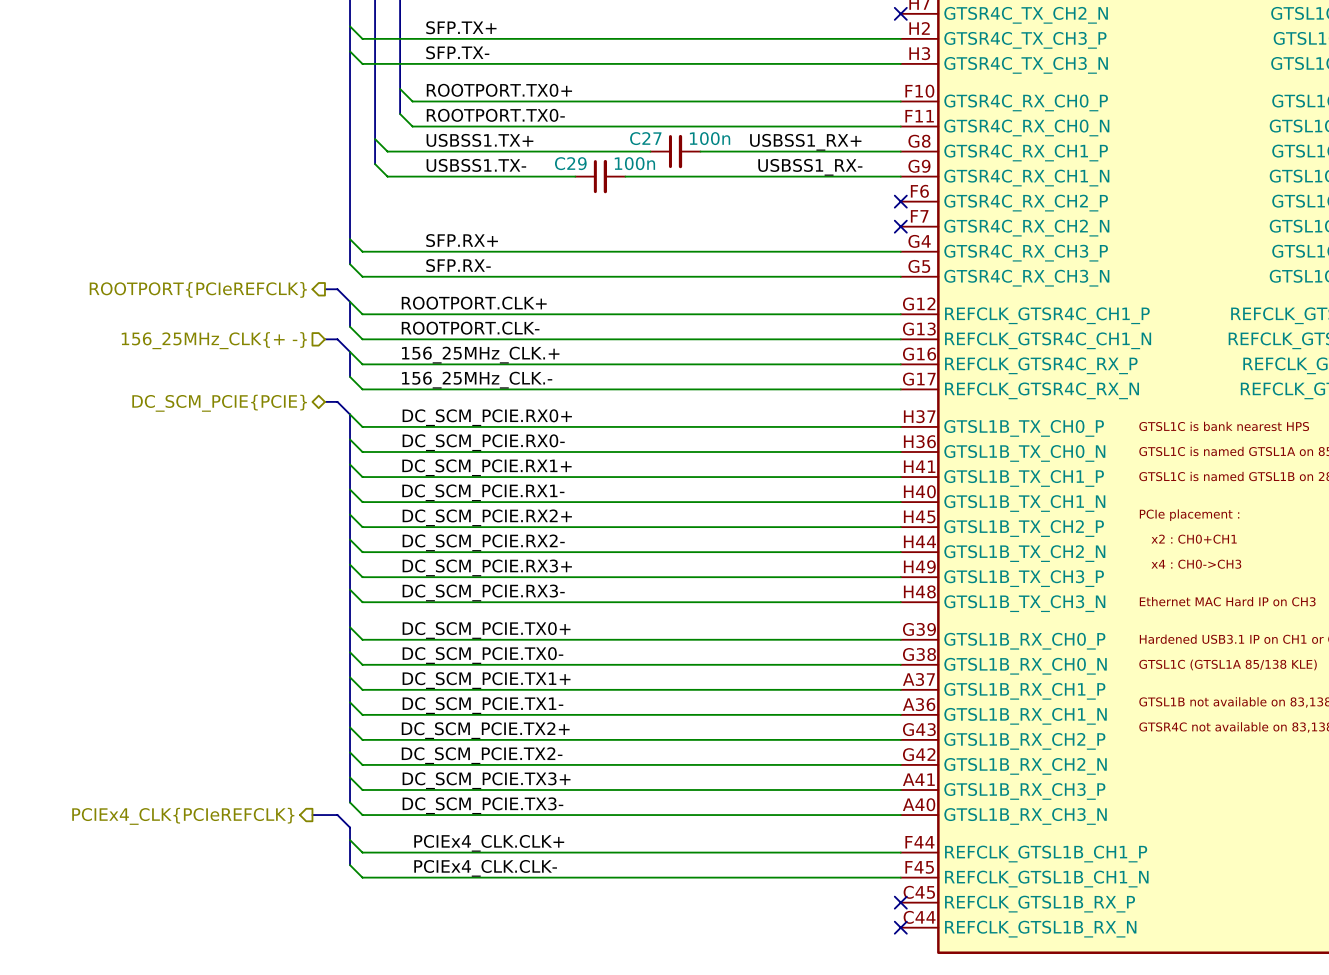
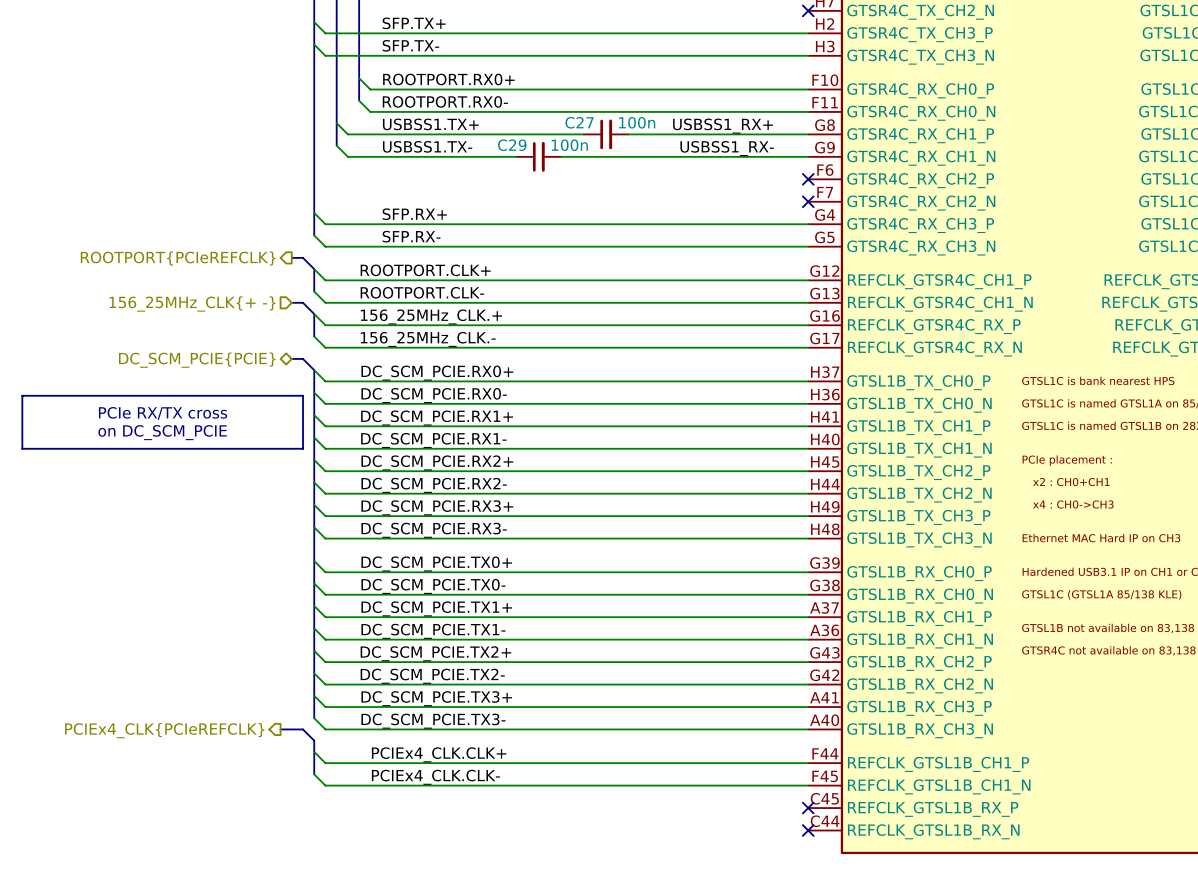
label: ROOTPORT.TX0+ (499, 90) -> ROOTPORT.RX0+ (448, 79)
label: ROOTPORT.TX0- (495, 115) -> ROOTPORT.RX0- (445, 101)
line: none -> (22, 395) (303, 395) (303, 448) (22, 448) (22, 395)
text: none -> PCIe RX/TX cross (163, 413)
text: none -> on DC_SCM_PCIE (162, 432)

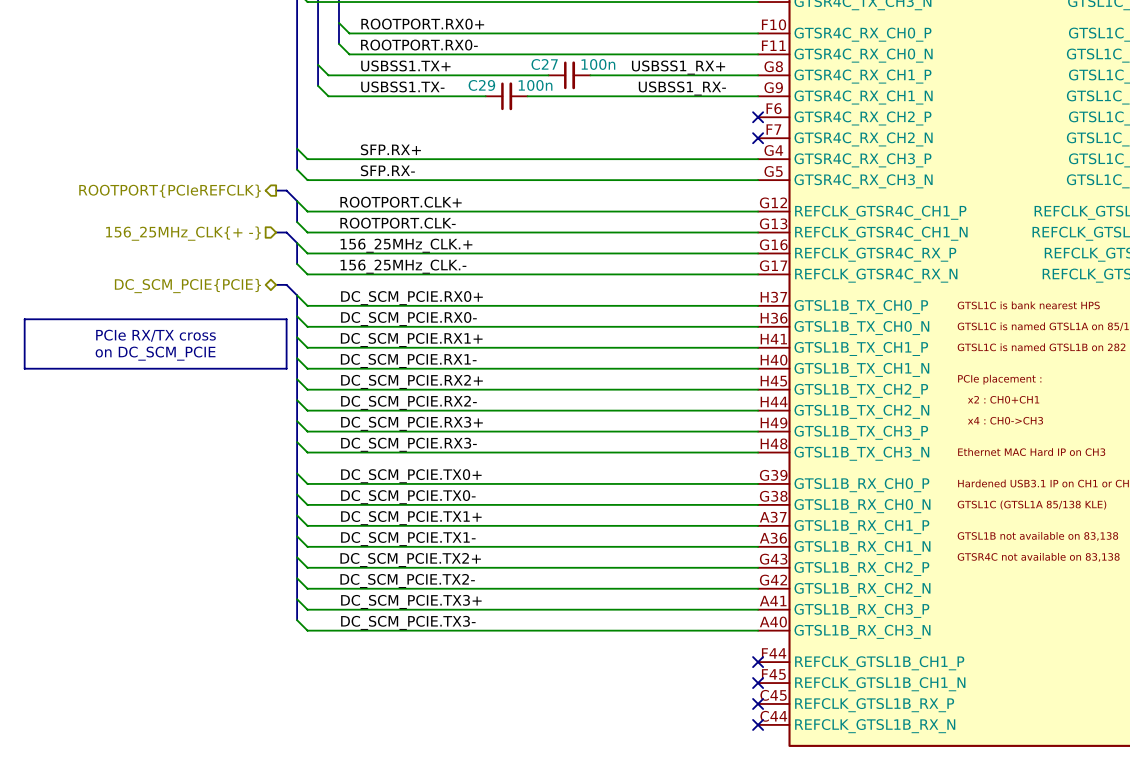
bus: (280, 729) (303, 729) (314, 740) (314, 774) -> none
hierarchical label: PCIEx4_CLK{PCIeREFCLK} (164, 730) -> none
wire: (314, 751) (325, 763) (808, 763) -> none
label: PCIEx4_CLK.CLK+ (439, 754) -> none
no-connect mark: none -> (758, 662)
wire: (314, 774) (325, 785) (808, 785) -> none
label: PCIEx4_CLK.CLK- (435, 777) -> none
no-connect mark: none -> (758, 683)

